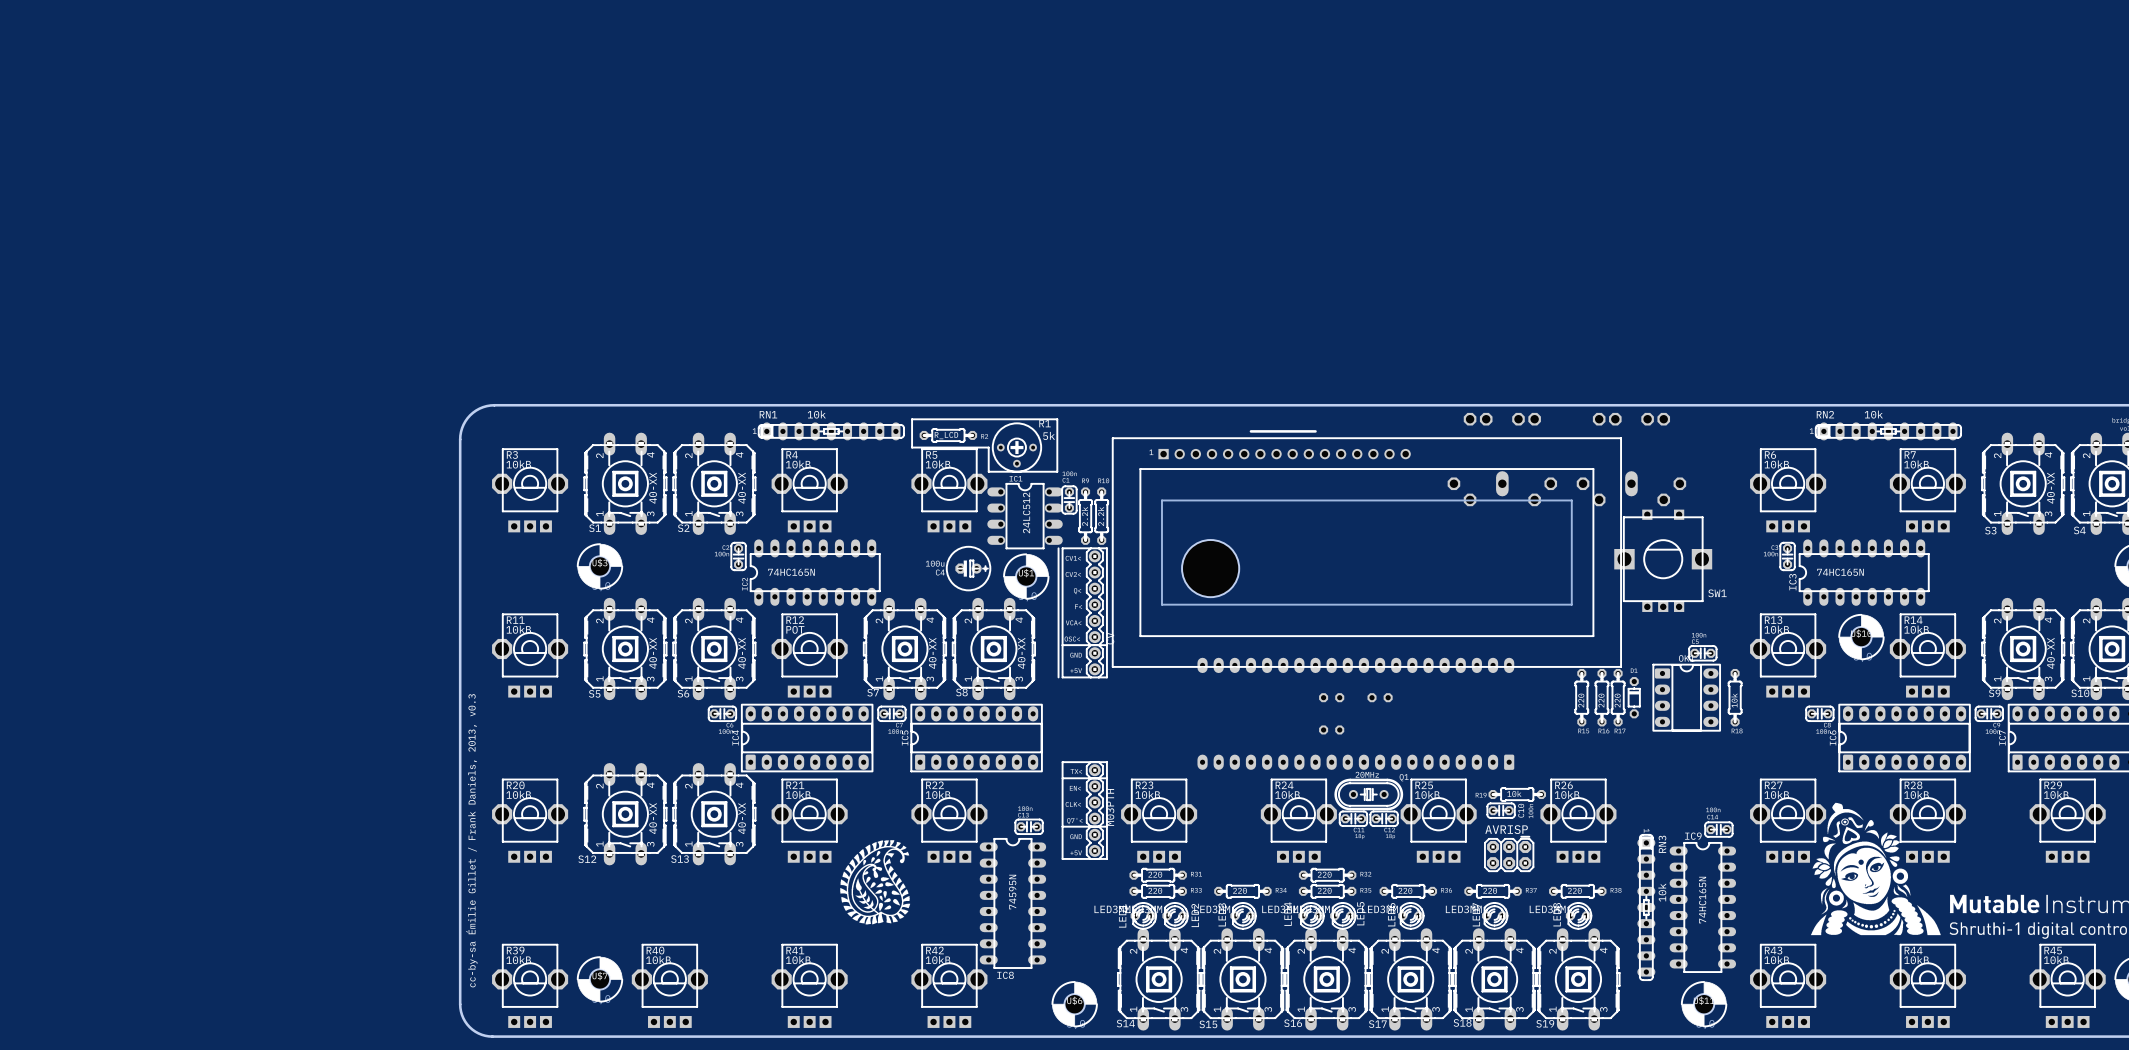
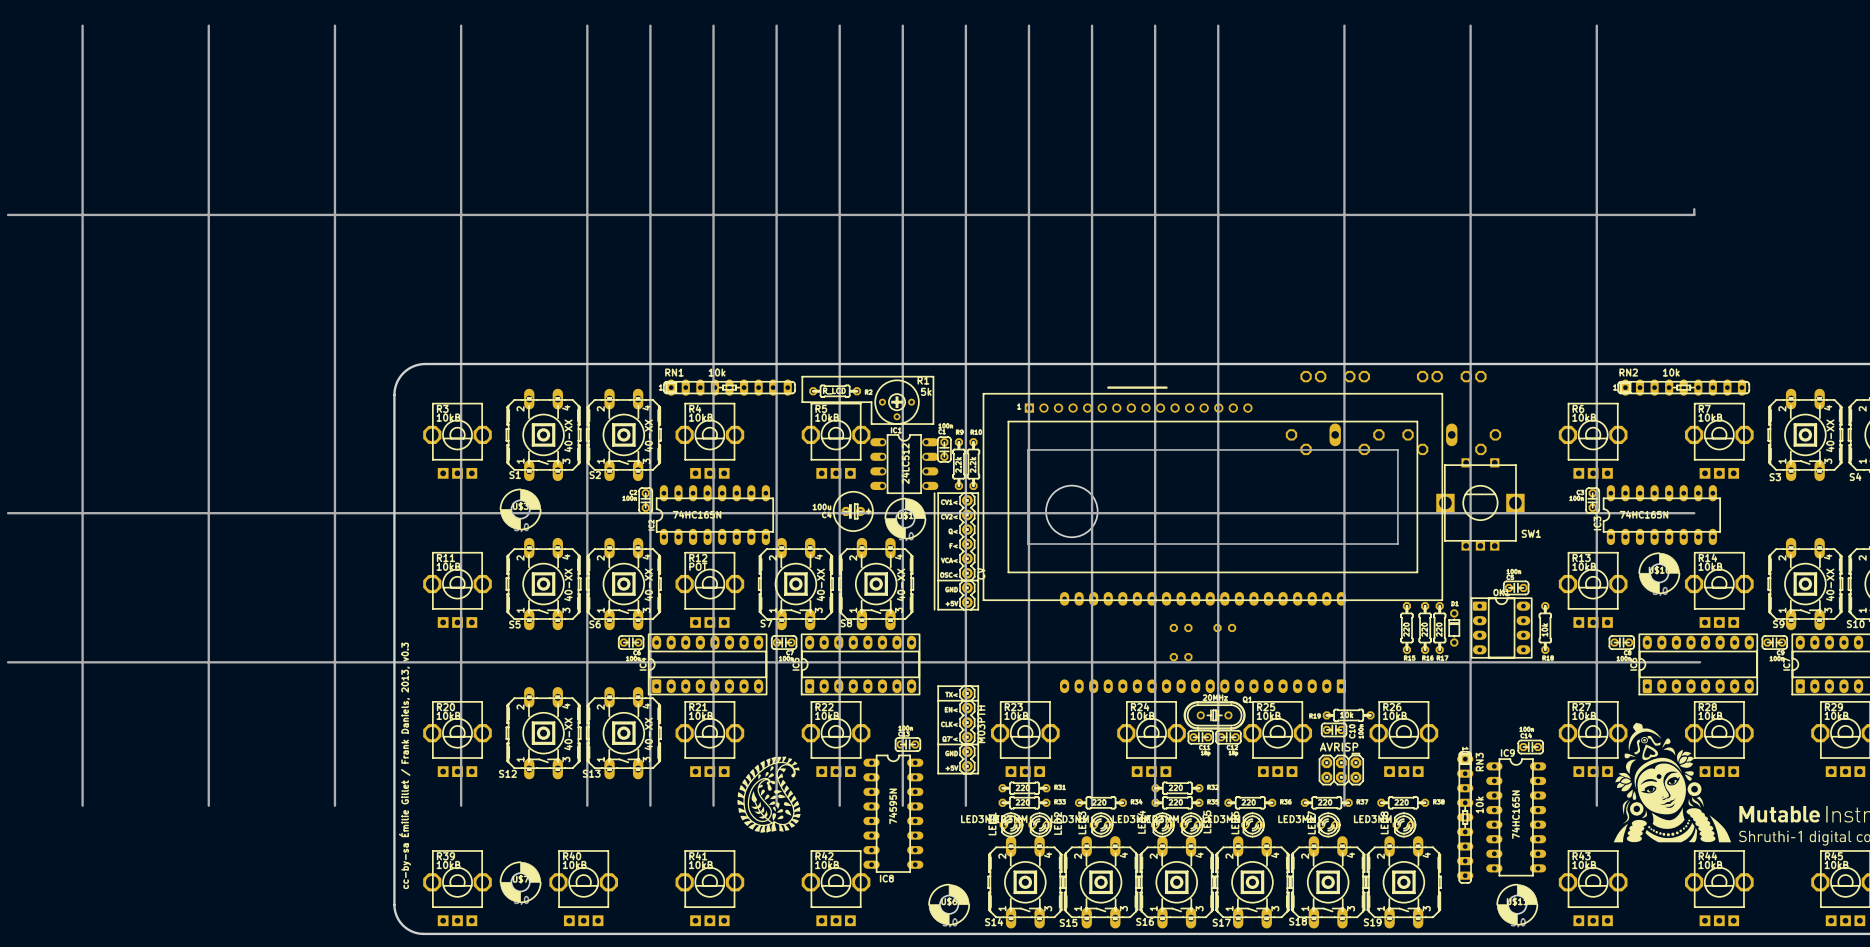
line: none -> (82, 25) (82, 805)
line: none -> (208, 25) (208, 805)
line: none -> (334, 25) (334, 805)
line: none -> (461, 25) (461, 805)
line: none -> (587, 25) (587, 805)
line: none -> (650, 25) (650, 805)
line: none -> (713, 25) (713, 805)
line: none -> (776, 25) (776, 805)
line: none -> (839, 25) (839, 805)
line: none -> (902, 25) (902, 805)
line: none -> (965, 25) (965, 805)
line: none -> (1028, 25) (1028, 805)
line: none -> (1092, 25) (1092, 805)
line: none -> (1155, 25) (1155, 805)
line: none -> (1218, 25) (1218, 805)
line: none -> (1344, 25) (1344, 805)
line: none -> (1470, 25) (1470, 805)
line: none -> (1596, 25) (1596, 805)
line: none -> (1694, 209) (1694, 214) (8, 214)
line: none -> (8, 513) (1694, 513)
line: none -> (8, 662) (1700, 662)

